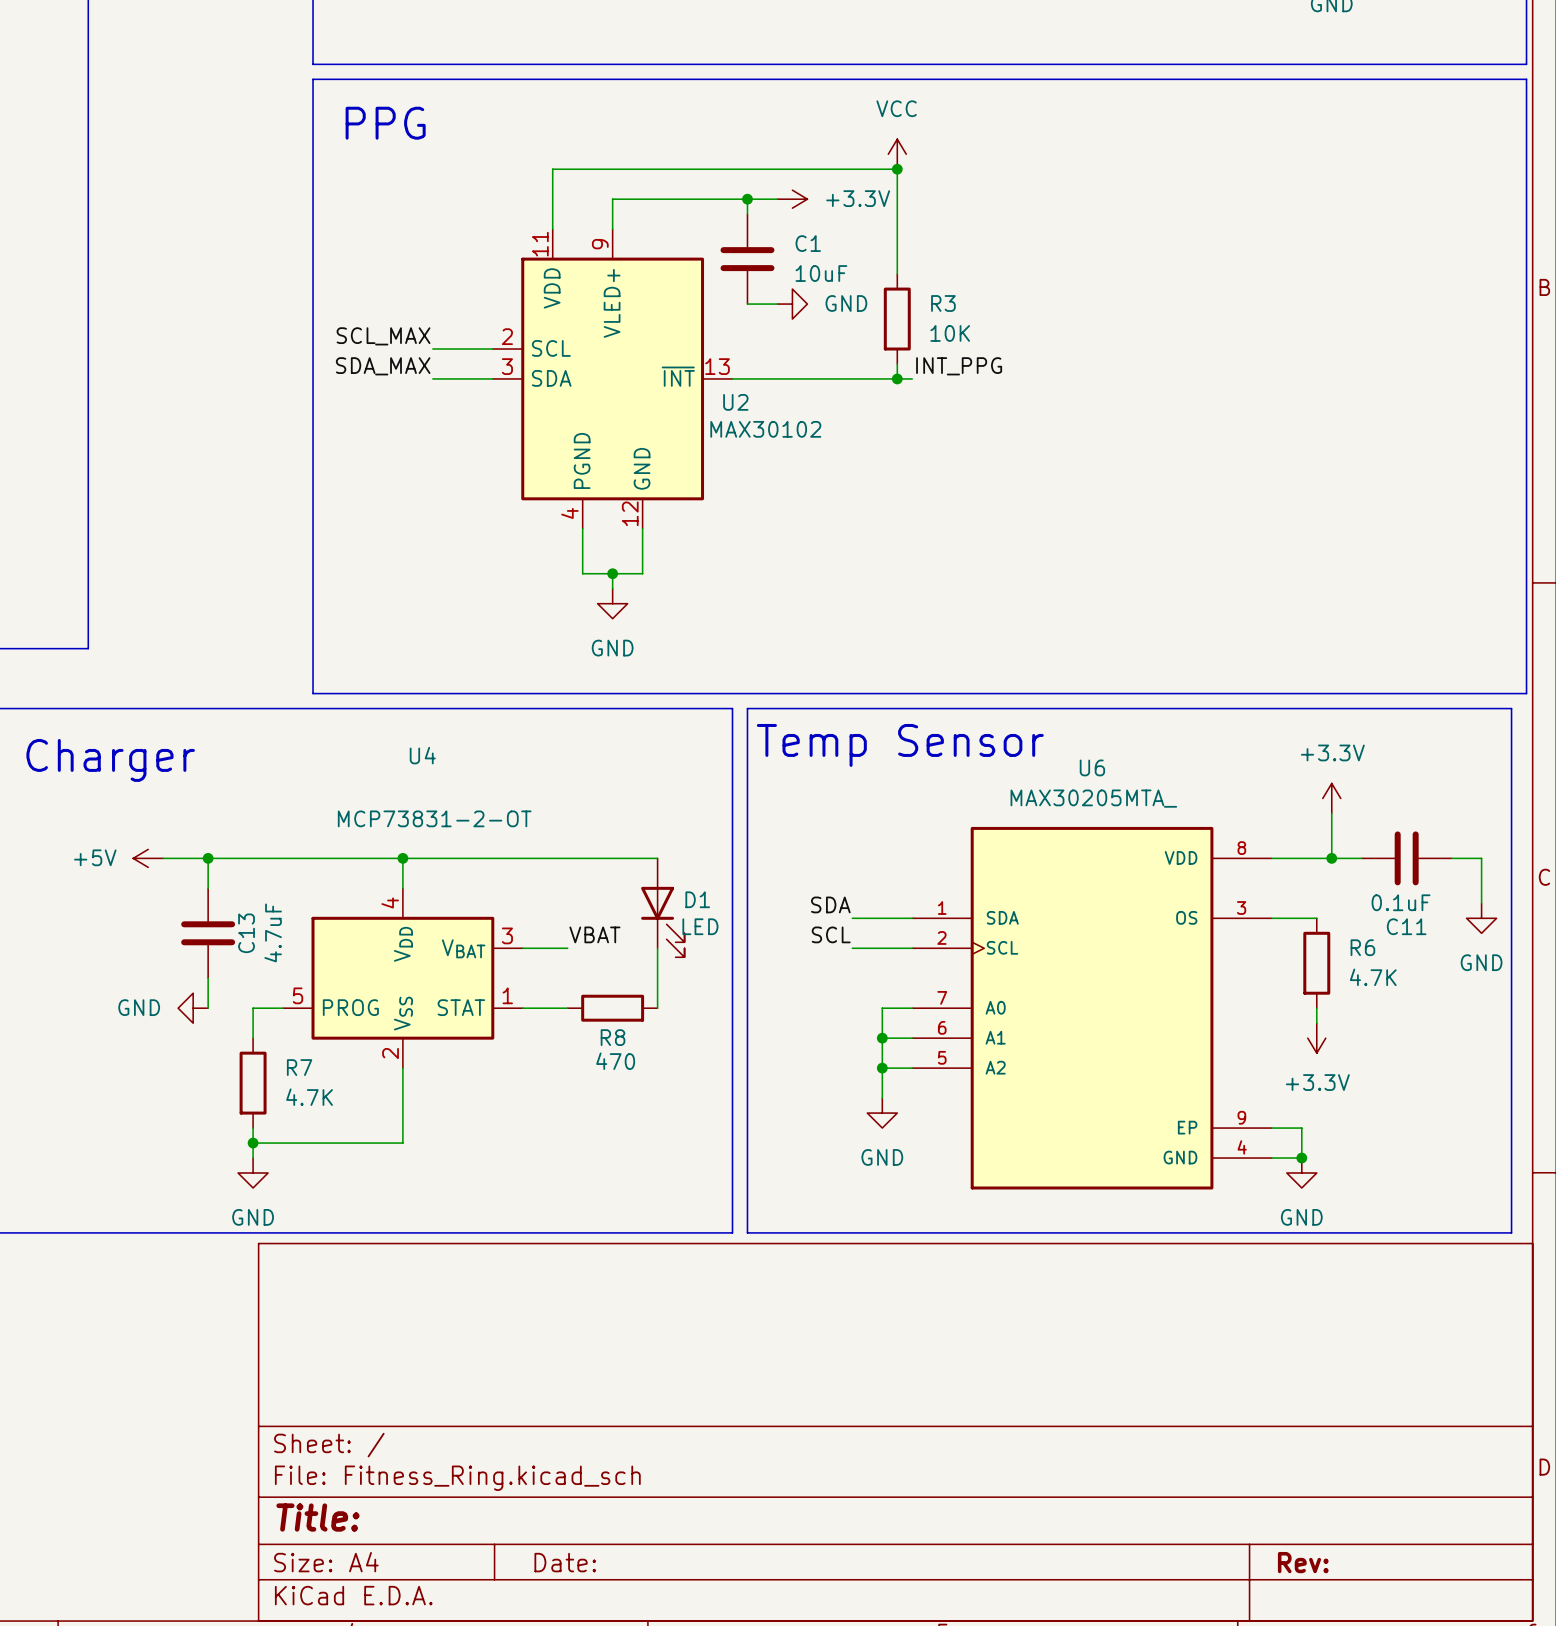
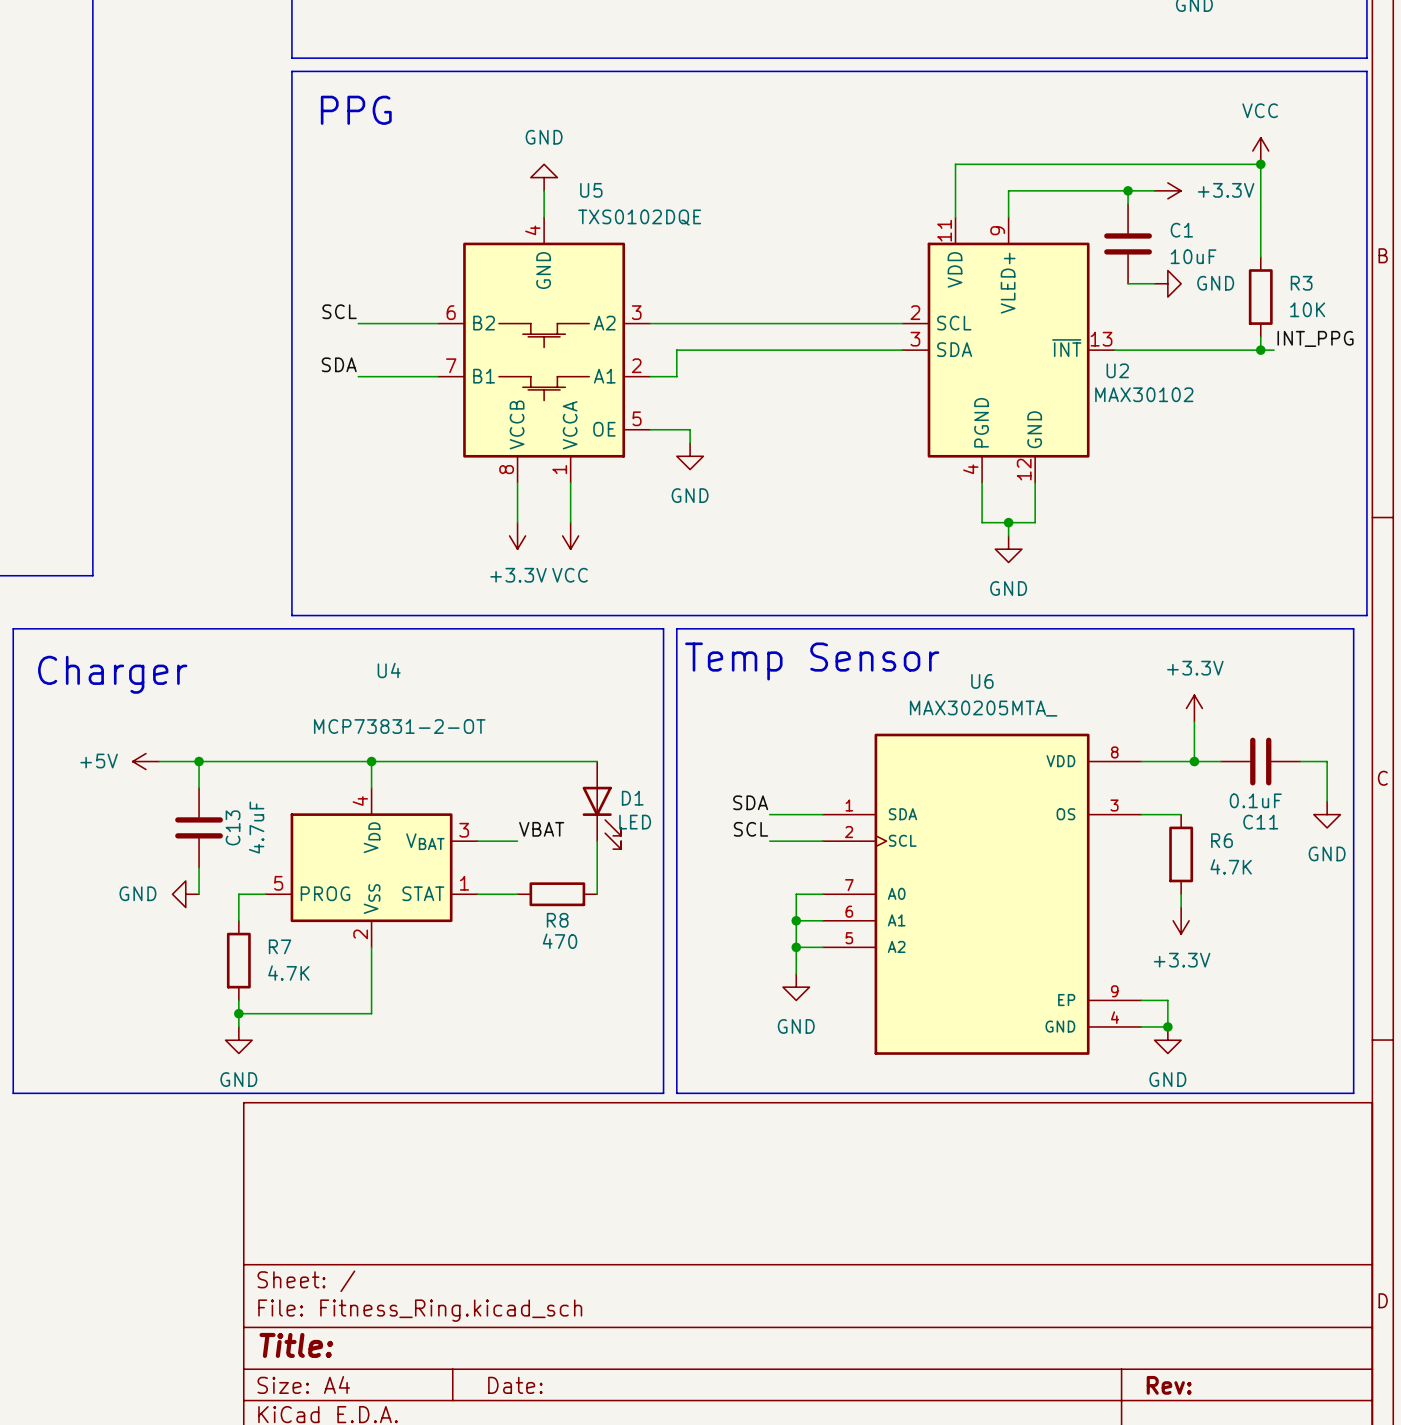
power symbol: VCC (897, 154) -> none
junction: (897, 169) -> none
power symbol: none -> VCC (1260, 151)
junction: none -> (1260, 164)
power symbol: none -> GND (544, 177)
wire: (747, 199) (747, 214) -> none
junction: (747, 199) -> none
wire: (777, 199) (612, 199) (612, 229) -> none
power symbol: +3.3V (792, 199) -> none
wire: none -> (544, 190) (544, 217)
wire: none -> (1128, 190) (1128, 204)
junction: none -> (1128, 190)
wire: none -> (1154, 190) (1008, 190) (1008, 217)
power symbol: none -> +3.3V (1167, 190)
wire: (552, 229) (552, 169) (897, 169) (897, 274) -> none
wire: none -> (955, 217) (955, 164) (1260, 164) (1260, 257)
C1 position: (747, 259) -> (1128, 243)
wire: (747, 304) (777, 304) -> none
power symbol: GND (792, 304) -> none
R3 position: (897, 319) -> (1260, 297)
wire: none -> (1128, 283) (1154, 283)
power symbol: none -> GND (1167, 283)
label: SCL_MAX (383, 336) -> none
wire: (432, 349) (492, 349) -> none
label: none -> SCL (339, 311)
wire: none -> (358, 323) (437, 323)
wire: none -> (650, 323) (902, 323)
wire: (897, 363) (897, 378) -> none
label: SDA_MAX (383, 366) -> none
label: INT_PPG (959, 366) -> none
wire: (432, 378) (492, 378) -> none
U2 position: (612, 378) -> (1008, 350)
wire: (732, 378) (912, 378) -> none
junction: (897, 378) -> none
wire: none -> (1260, 336) (1260, 350)
label: none -> INT_PPG (1315, 338)
U5: none -> TXS0102DQE (544, 350)
wire: none -> (902, 350) (676, 350) (676, 376) (650, 376)
wire: none -> (1114, 350) (1274, 350)
junction: none -> (1260, 350)
label: none -> SDA (339, 364)
wire: none -> (358, 376) (437, 376)
wire: none -> (650, 429) (690, 429) (690, 443)
power symbol: none -> GND (690, 456)
wire: (582, 528) (582, 573) (642, 573) (642, 528) -> none
wire: none -> (517, 482) (517, 522)
wire: none -> (570, 482) (570, 522)
wire: none -> (982, 482) (982, 522) (1035, 522) (1035, 482)
wire: (612, 573) (612, 588) -> none
junction: (612, 573) -> none
wire: none -> (1008, 522) (1008, 535)
junction: none -> (1008, 522)
power symbol: none -> +3.3V (517, 535)
power symbol: GND (612, 603) -> none
power symbol: none -> VCC (570, 535)
power symbol: none -> GND (1008, 549)

